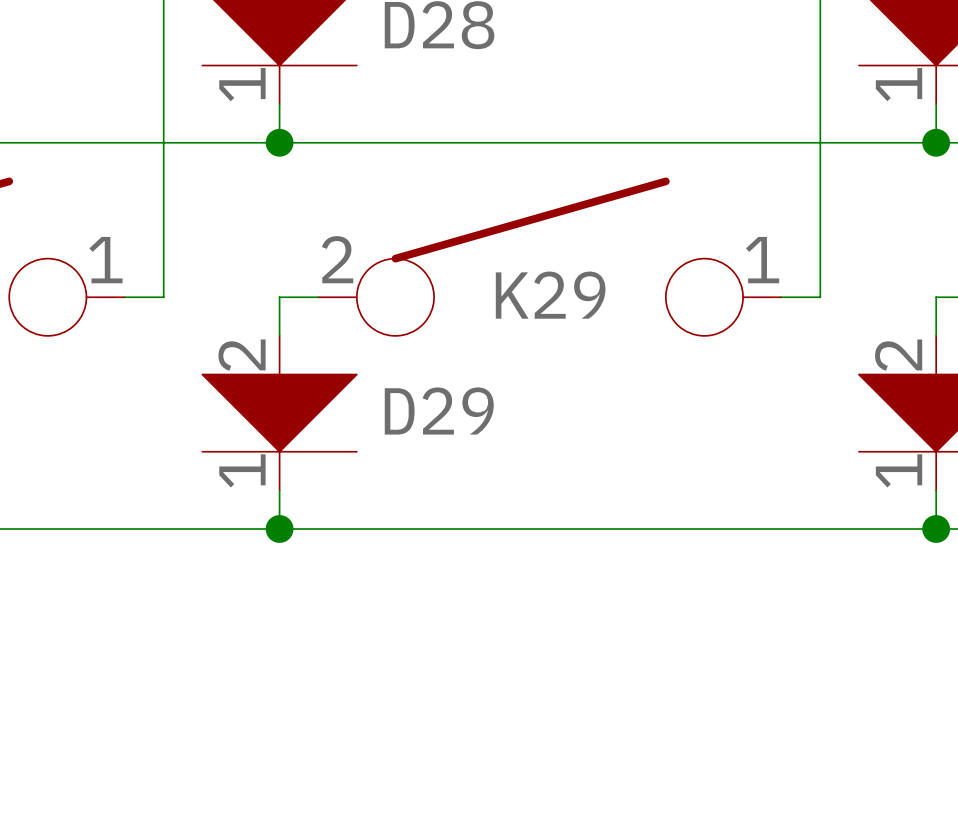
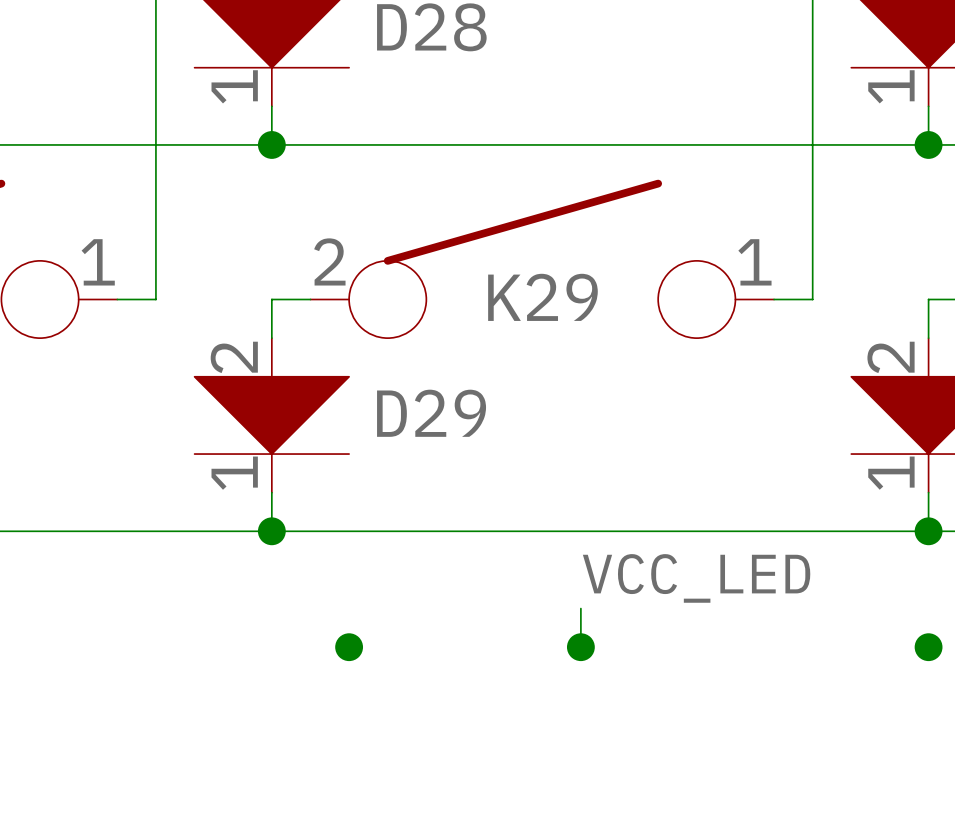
label: none -> VCC_LED (696, 578)
wire: none -> (580, 608) (580, 647)
junction: none -> (349, 647)
junction: none -> (580, 647)
junction: none -> (928, 647)

